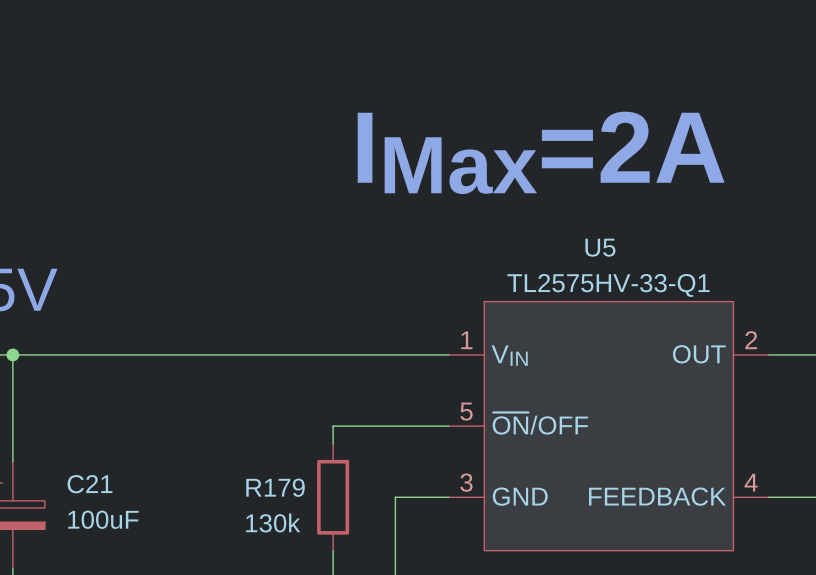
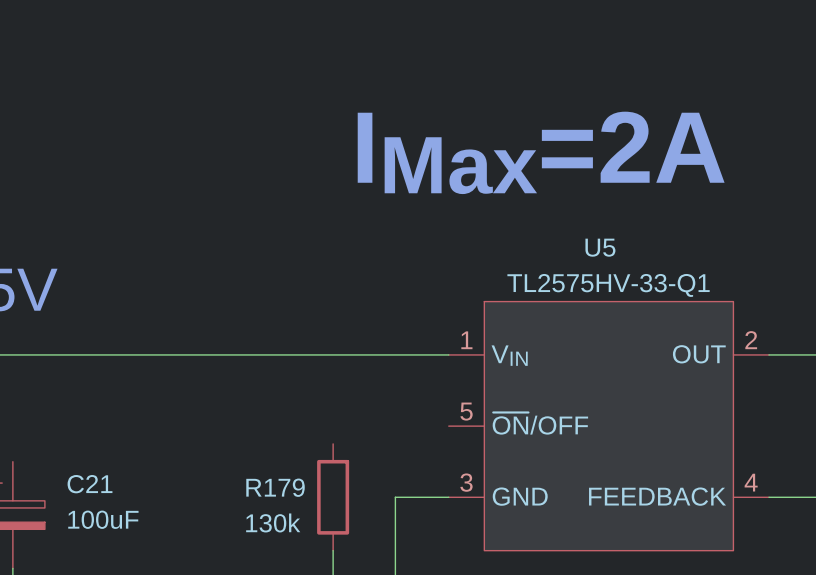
wire: (12, 354) (12, 461) -> none
junction: (12, 354) -> none
wire: (448, 426) (333, 426) (333, 443) -> none

